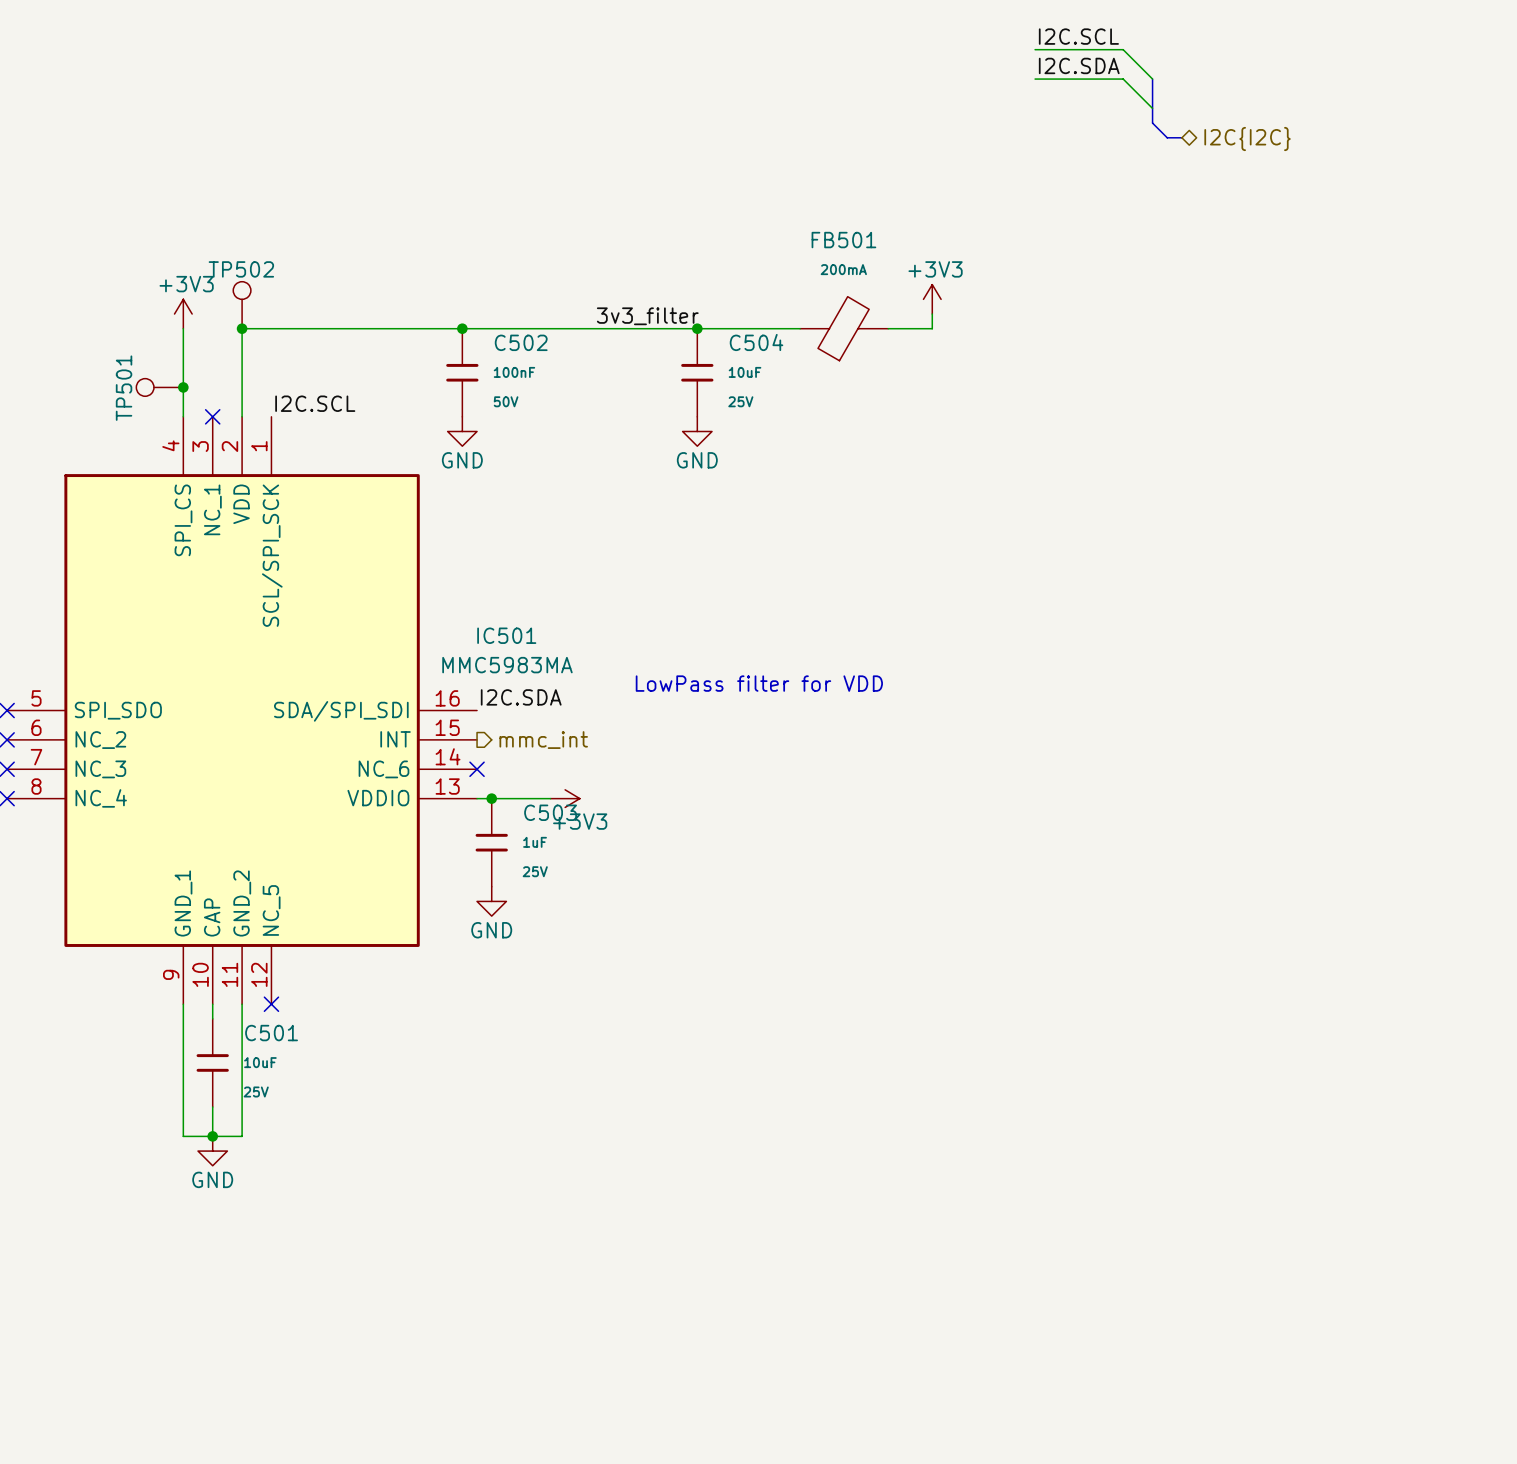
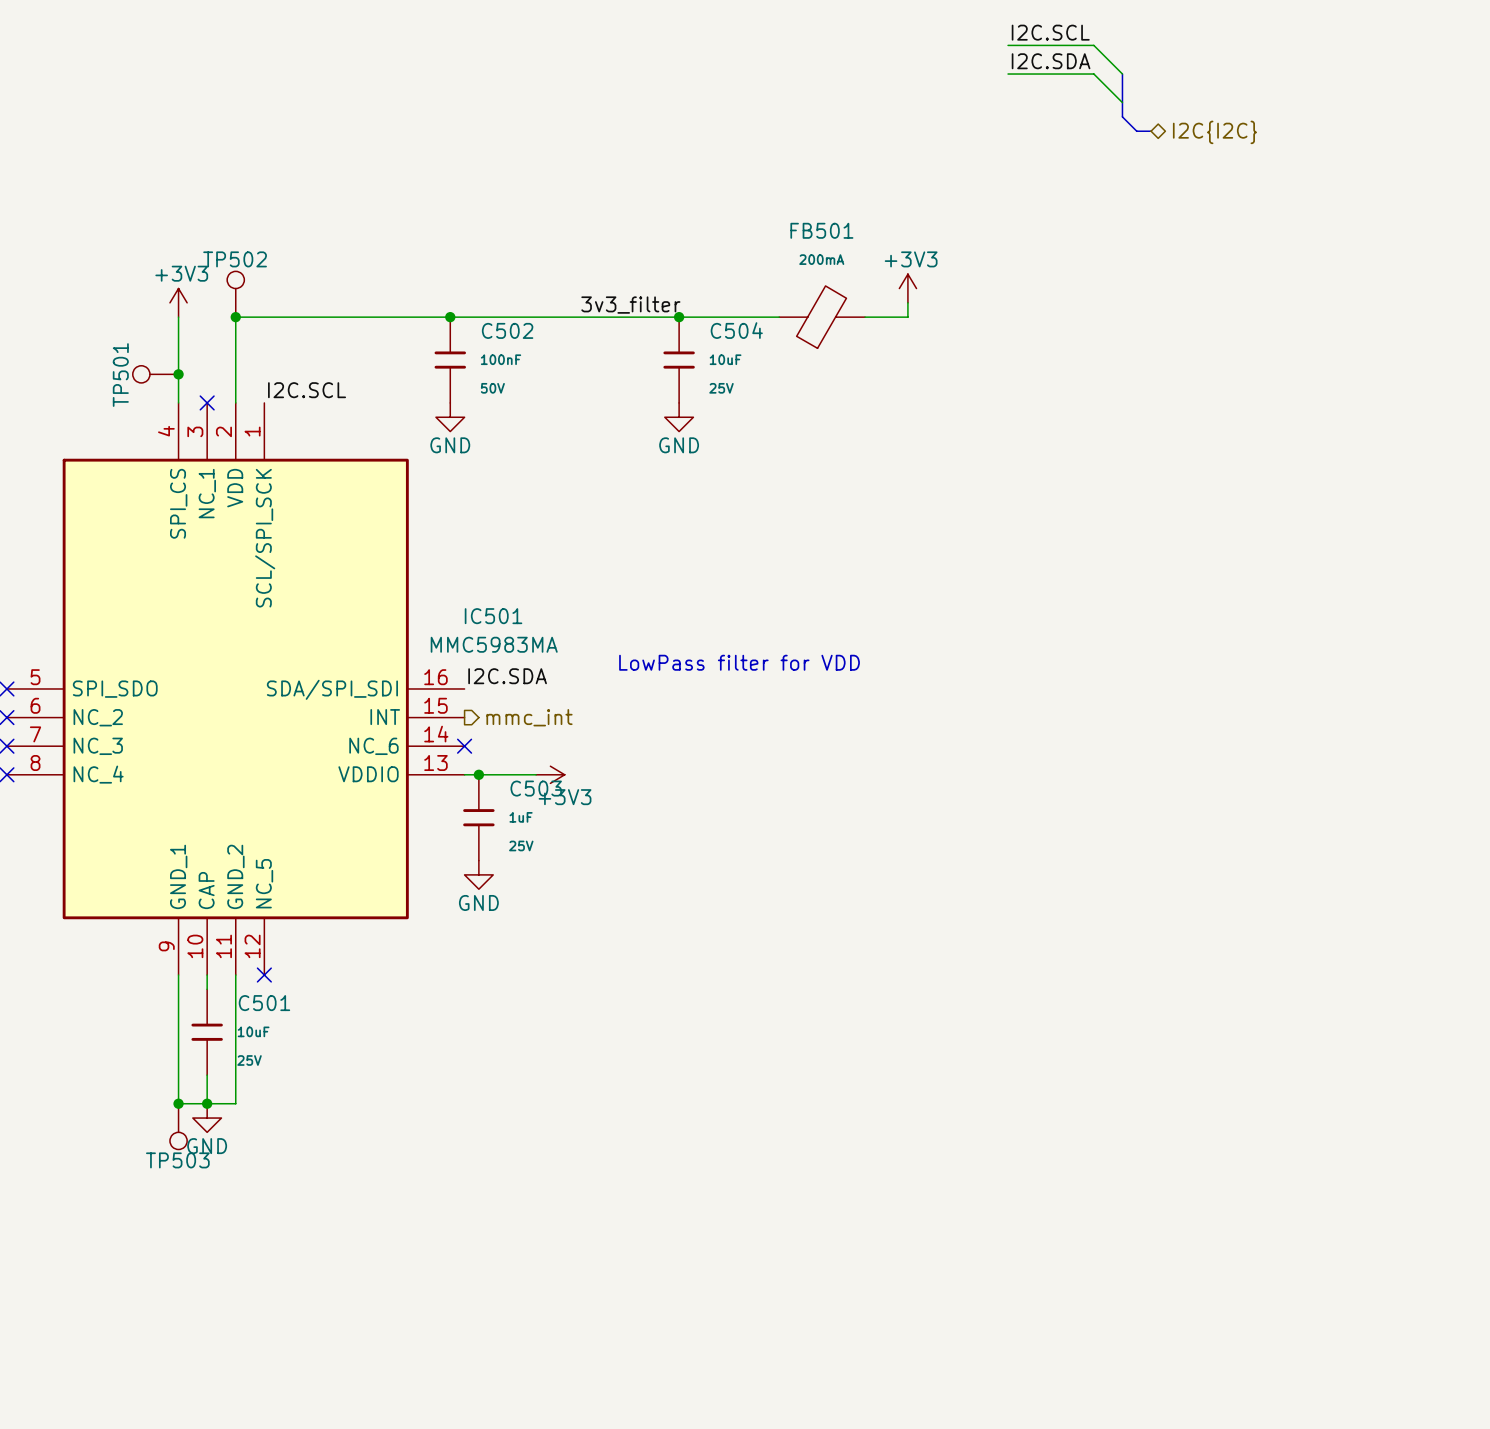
junction: none -> (178, 1103)
TP503: none -> (178, 1126)

